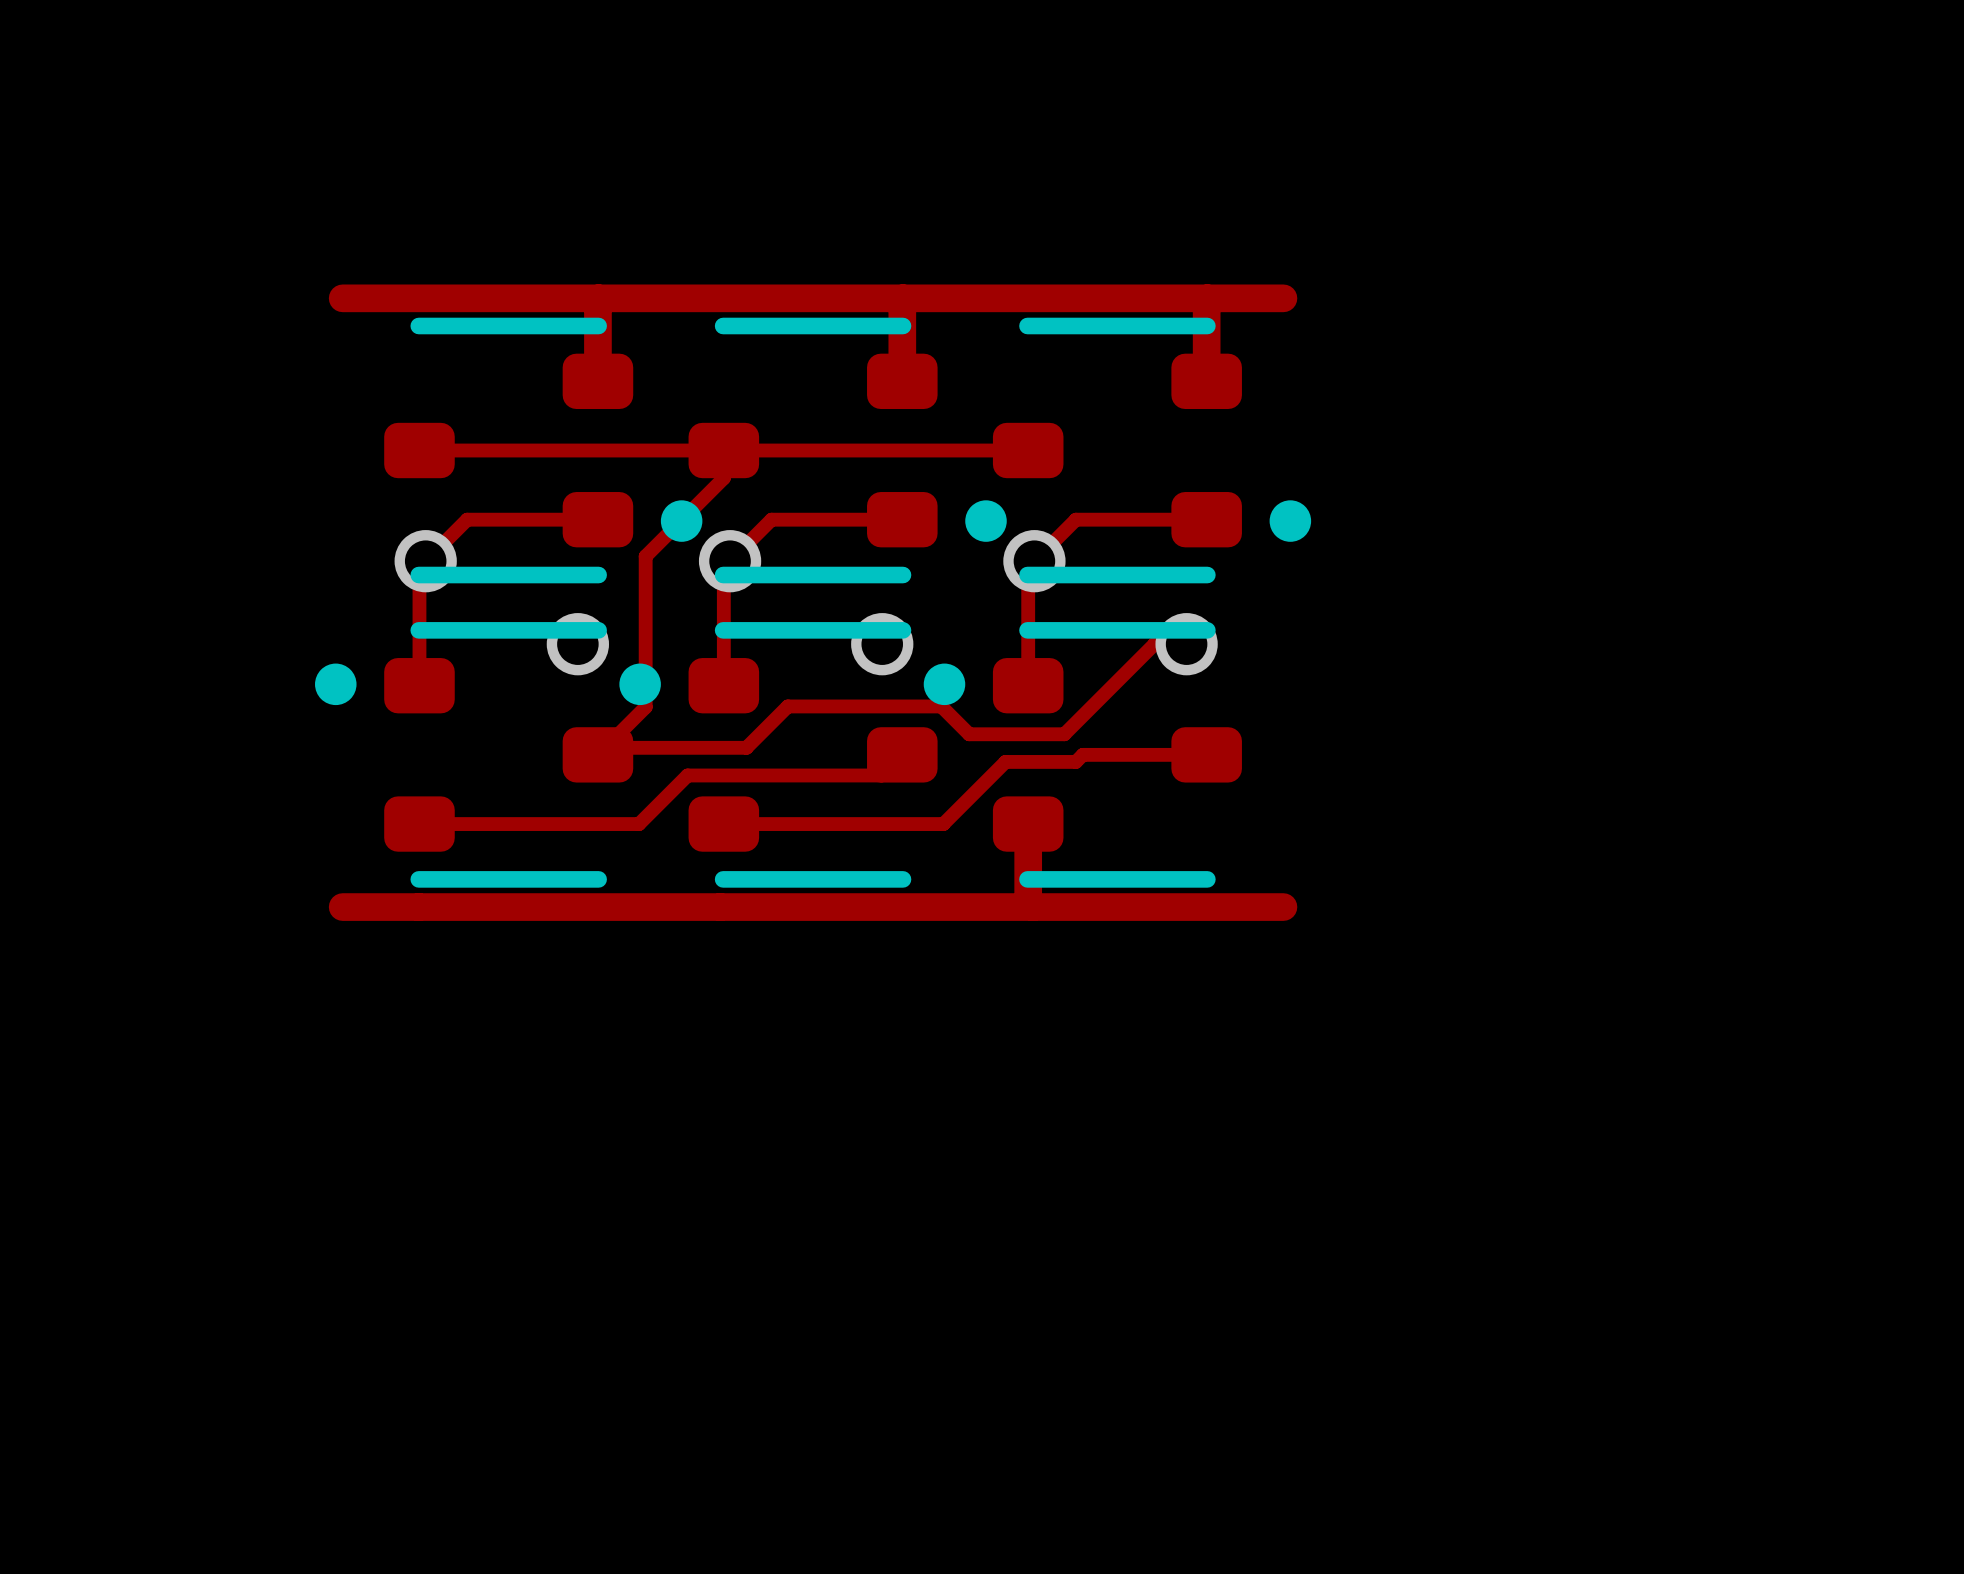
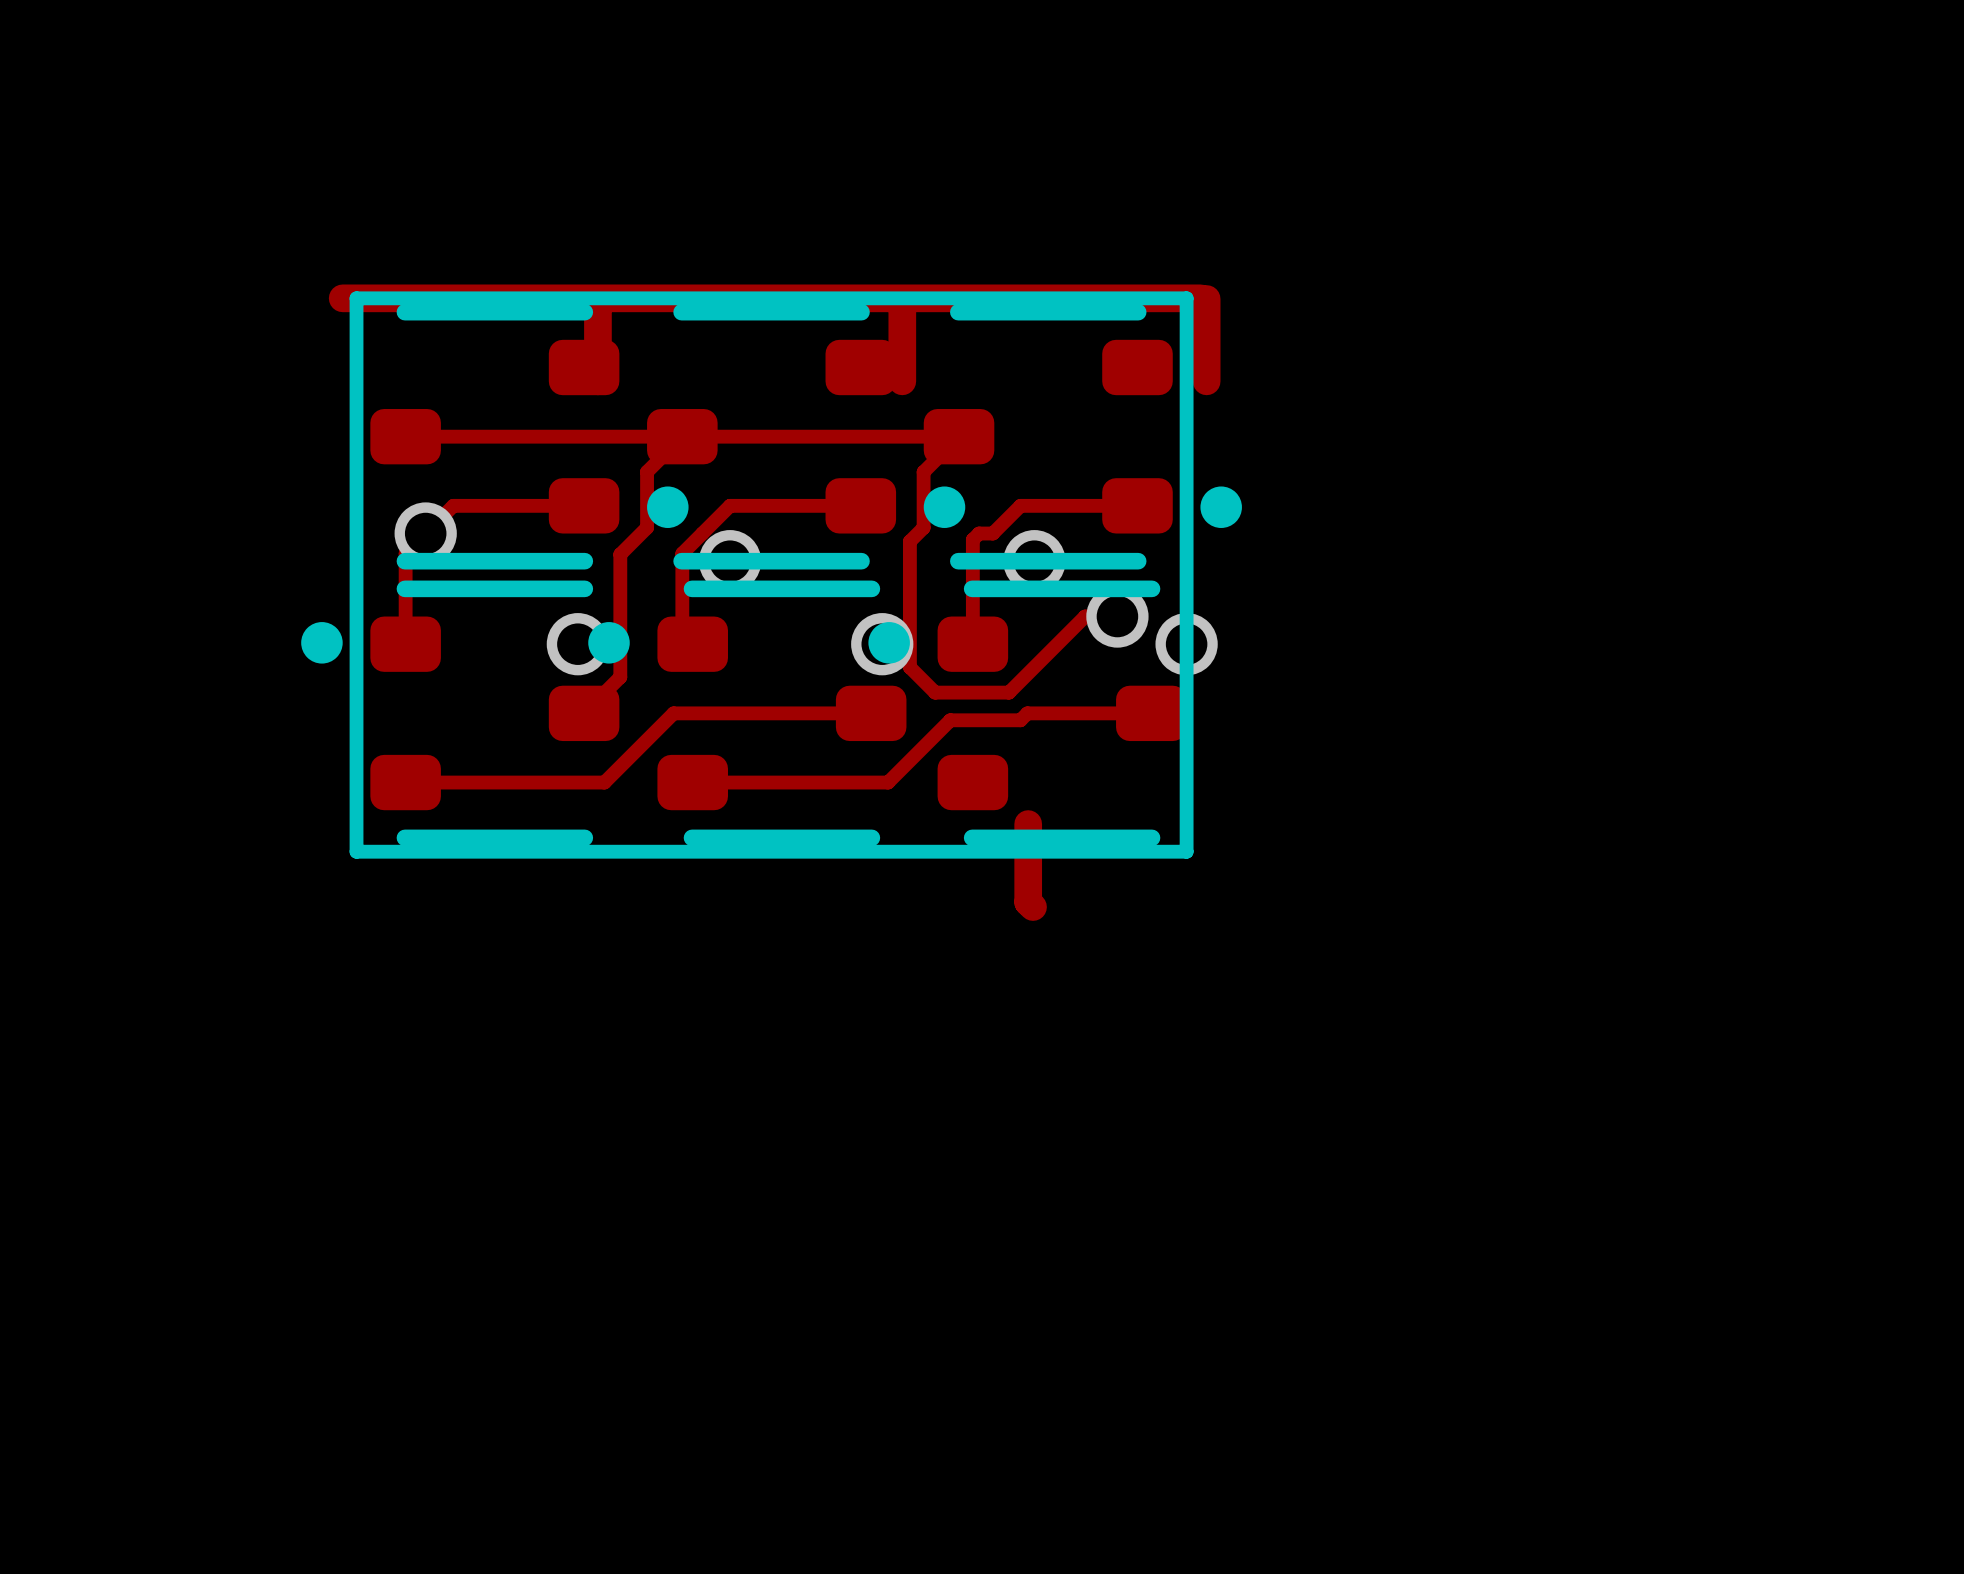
line: none -> (356, 298) (1186, 298) (1186, 851) (356, 851) (356, 298)
track: (1200, 298) (1283, 298) -> none
track: none -> (405, 436) (960, 436)
track: none -> (682, 436) (647, 471) (647, 527) (620, 554) (620, 677) (584, 713)
track: none -> (959, 436) (923, 472) (923, 527) (909, 541) (909, 667) (935, 692) (1009, 692) (1085, 616) (1117, 616) (1117, 593)
track: (419, 450) (1028, 450) -> none
part position: (543, 450) -> (529, 436)
track: (723, 450) (723, 478) (645, 556) (645, 707) (597, 754) -> none
part position: (847, 450) -> (806, 436)
part position: (1152, 450) -> (1082, 436)
track: none -> (584, 505) (453, 505) (405, 553) (405, 644)
track: none -> (860, 505) (730, 505) (682, 553) (682, 644)
track: none -> (1137, 505) (1020, 505) (992, 533) (979, 533) (972, 539) (972, 658)
track: (597, 519) (467, 519) (419, 567) (419, 685) -> none
track: (902, 519) (771, 519) (723, 567) (723, 685) -> none
track: (1206, 519) (1075, 519) (1028, 567) (1028, 685) -> none
via position: (425, 561) -> (425, 533)
via: none -> (1117, 616)
track: (1186, 644) (1154, 644) (1064, 734) (969, 734) (941, 706) (787, 706) (746, 747) (604, 747) -> none
track: none -> (867, 713) (673, 713) (604, 782) (405, 782)
track: none -> (1151, 713) (1027, 713) (1020, 720) (950, 720) (888, 782) (692, 782)
part position: (474, 754) -> (460, 713)
part position: (778, 754) -> (747, 713)
track: (902, 754) (881, 775) (687, 775) (639, 824) (419, 824) -> none
part position: (1082, 754) -> (1027, 713)
track: (1206, 754) (1082, 754) (1075, 761) (1005, 761) (943, 824) (723, 824) -> none
track: (342, 907) (1283, 907) -> none

